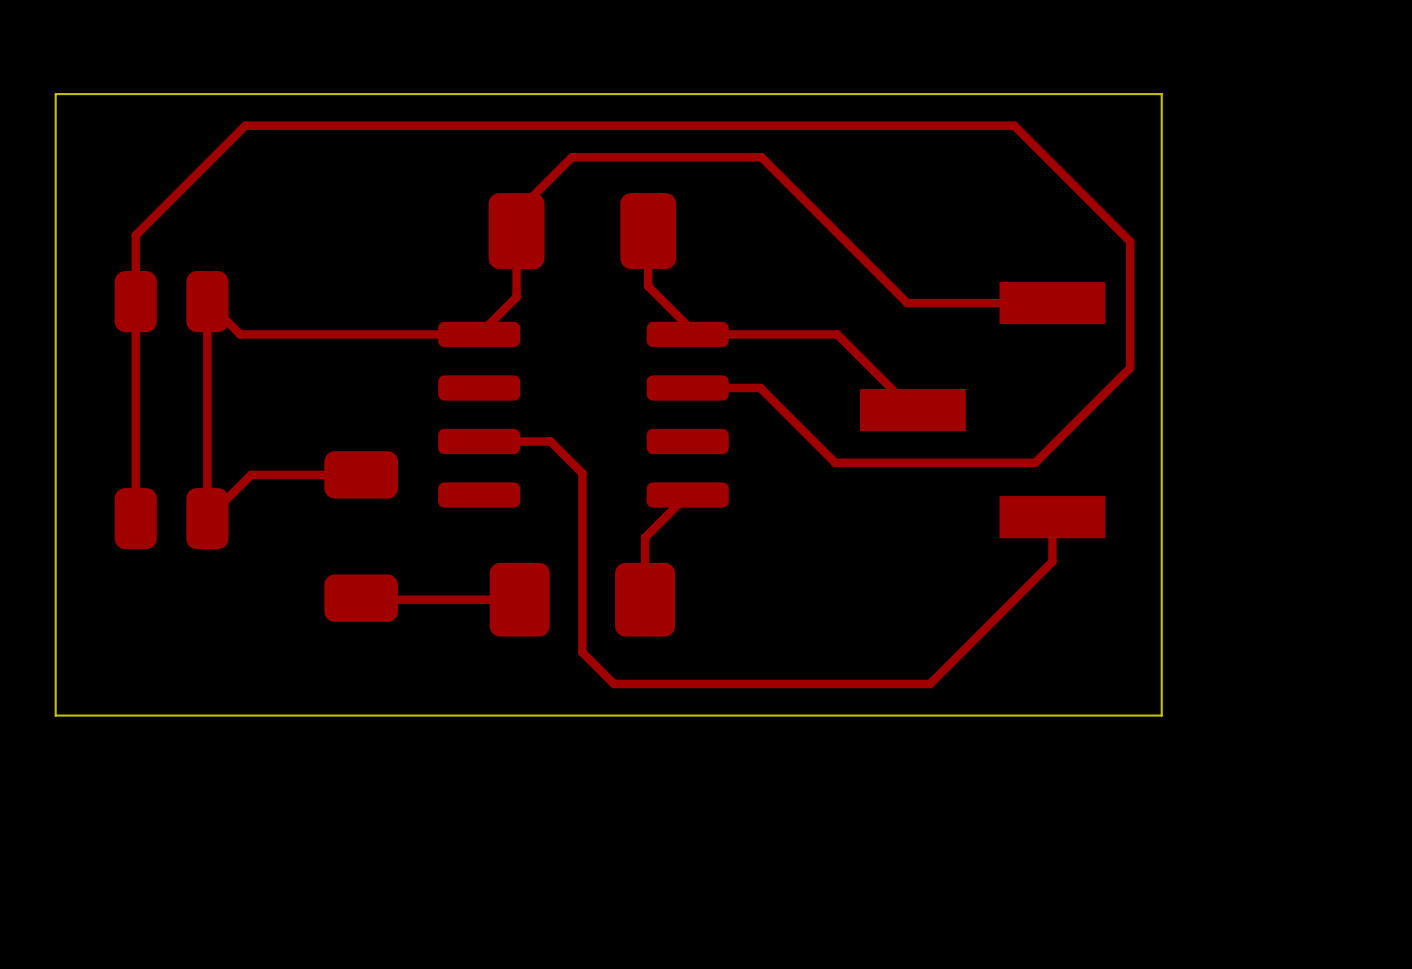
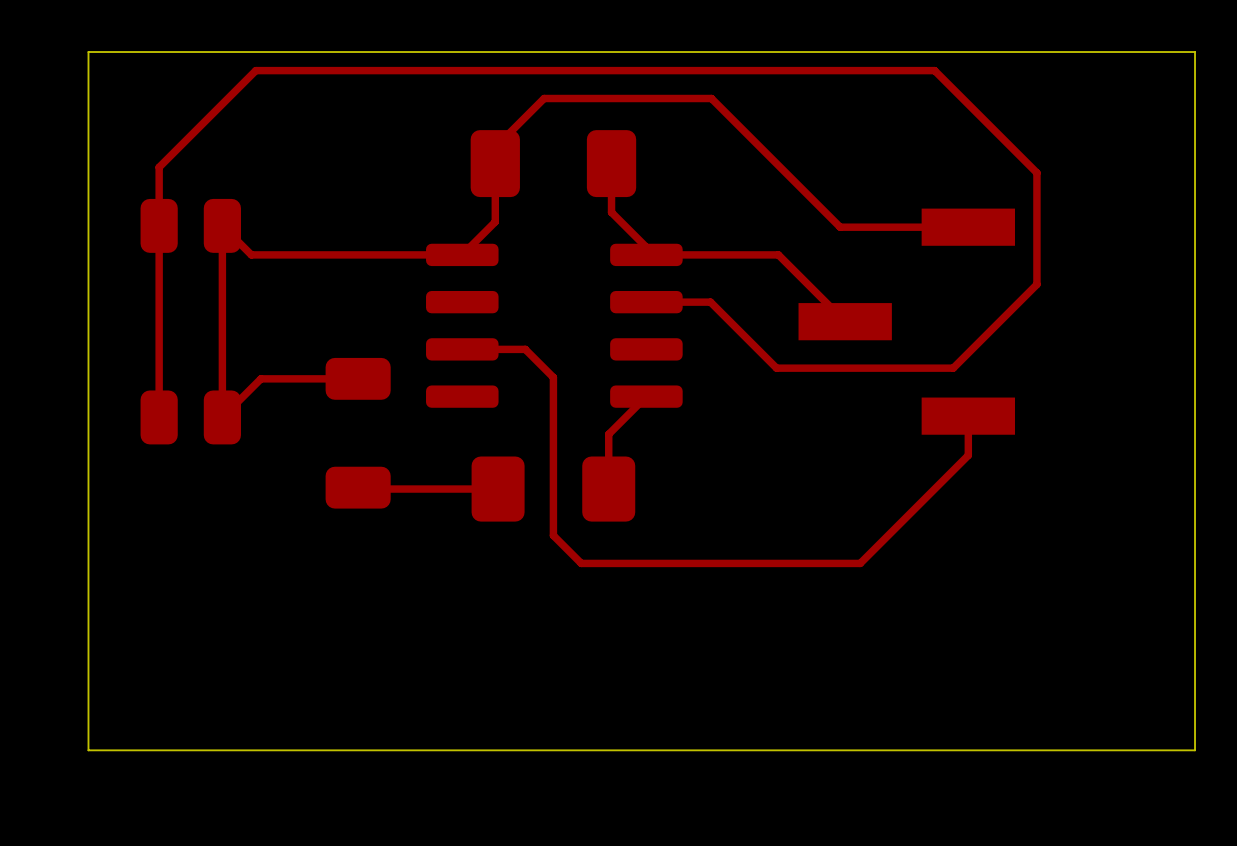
board edge: (55, 104) (55, 94) (1161, 94) (1161, 715) (55, 715) -> (88, 52) (1195, 52) (1195, 750) (88, 750) (88, 591)

